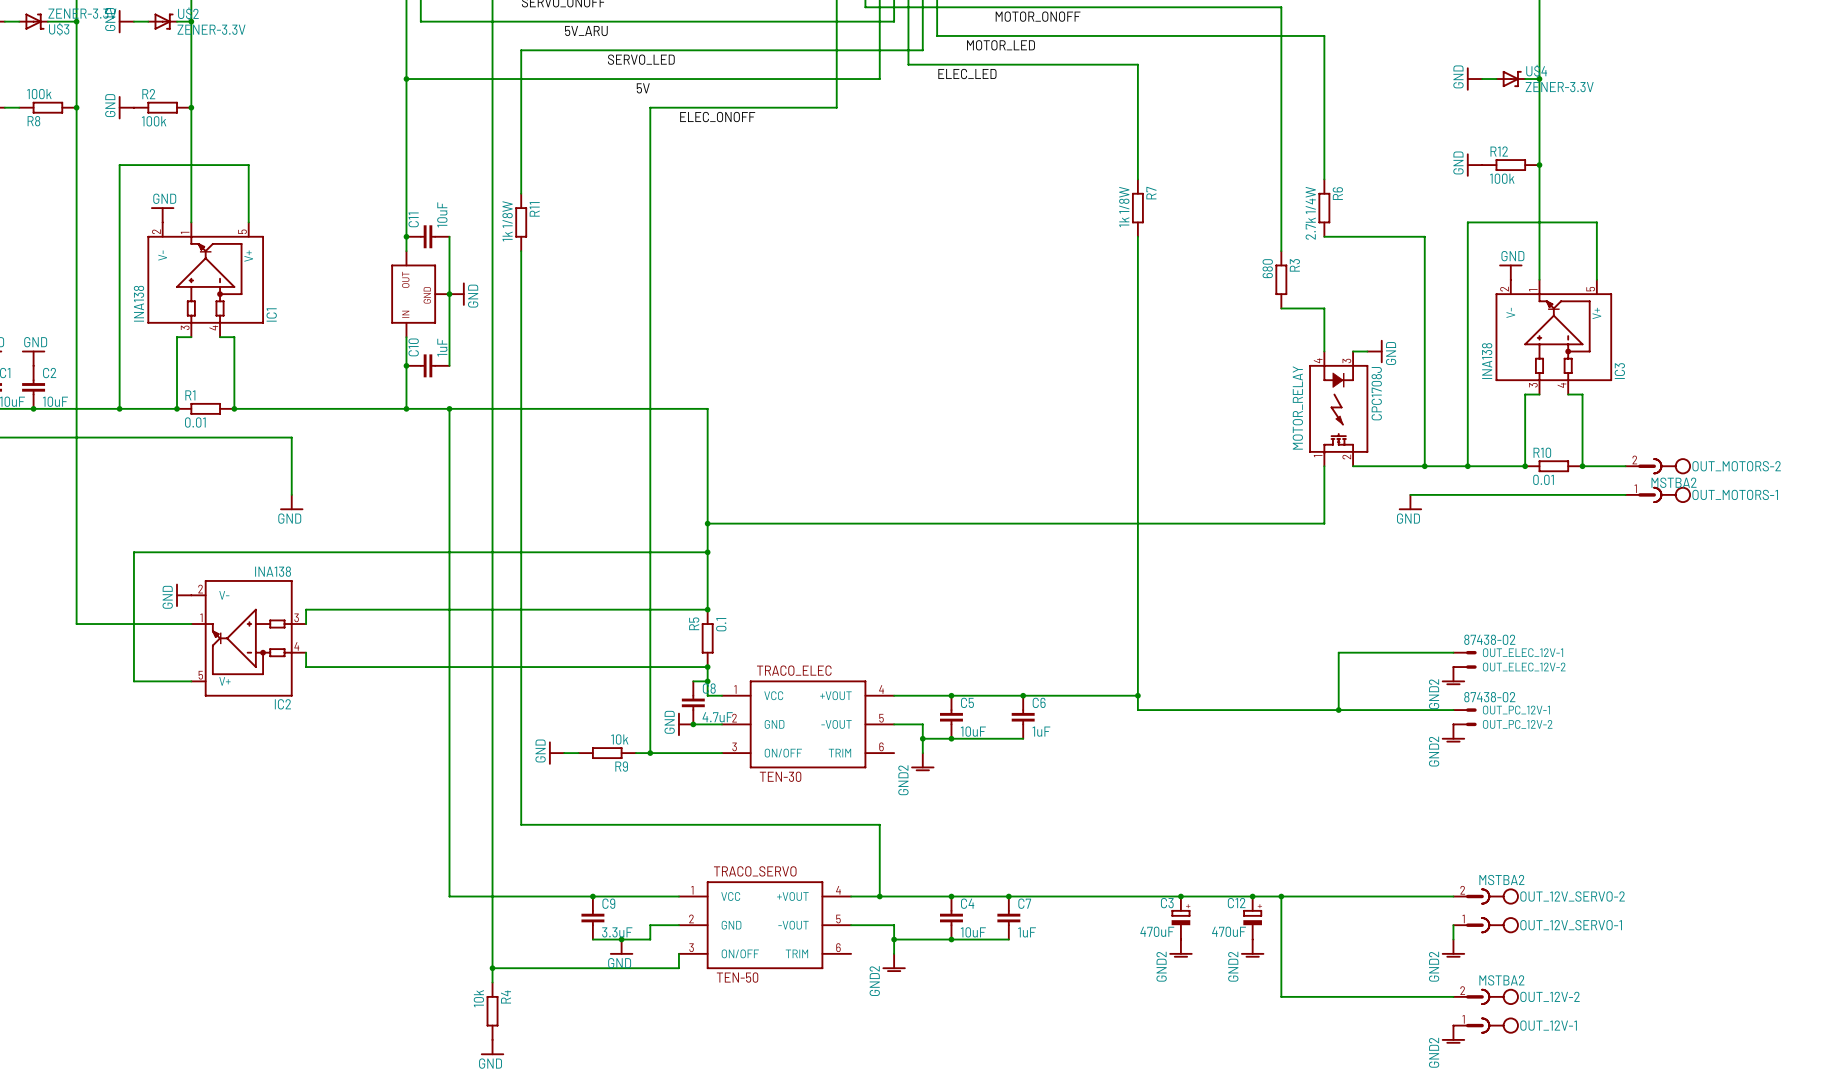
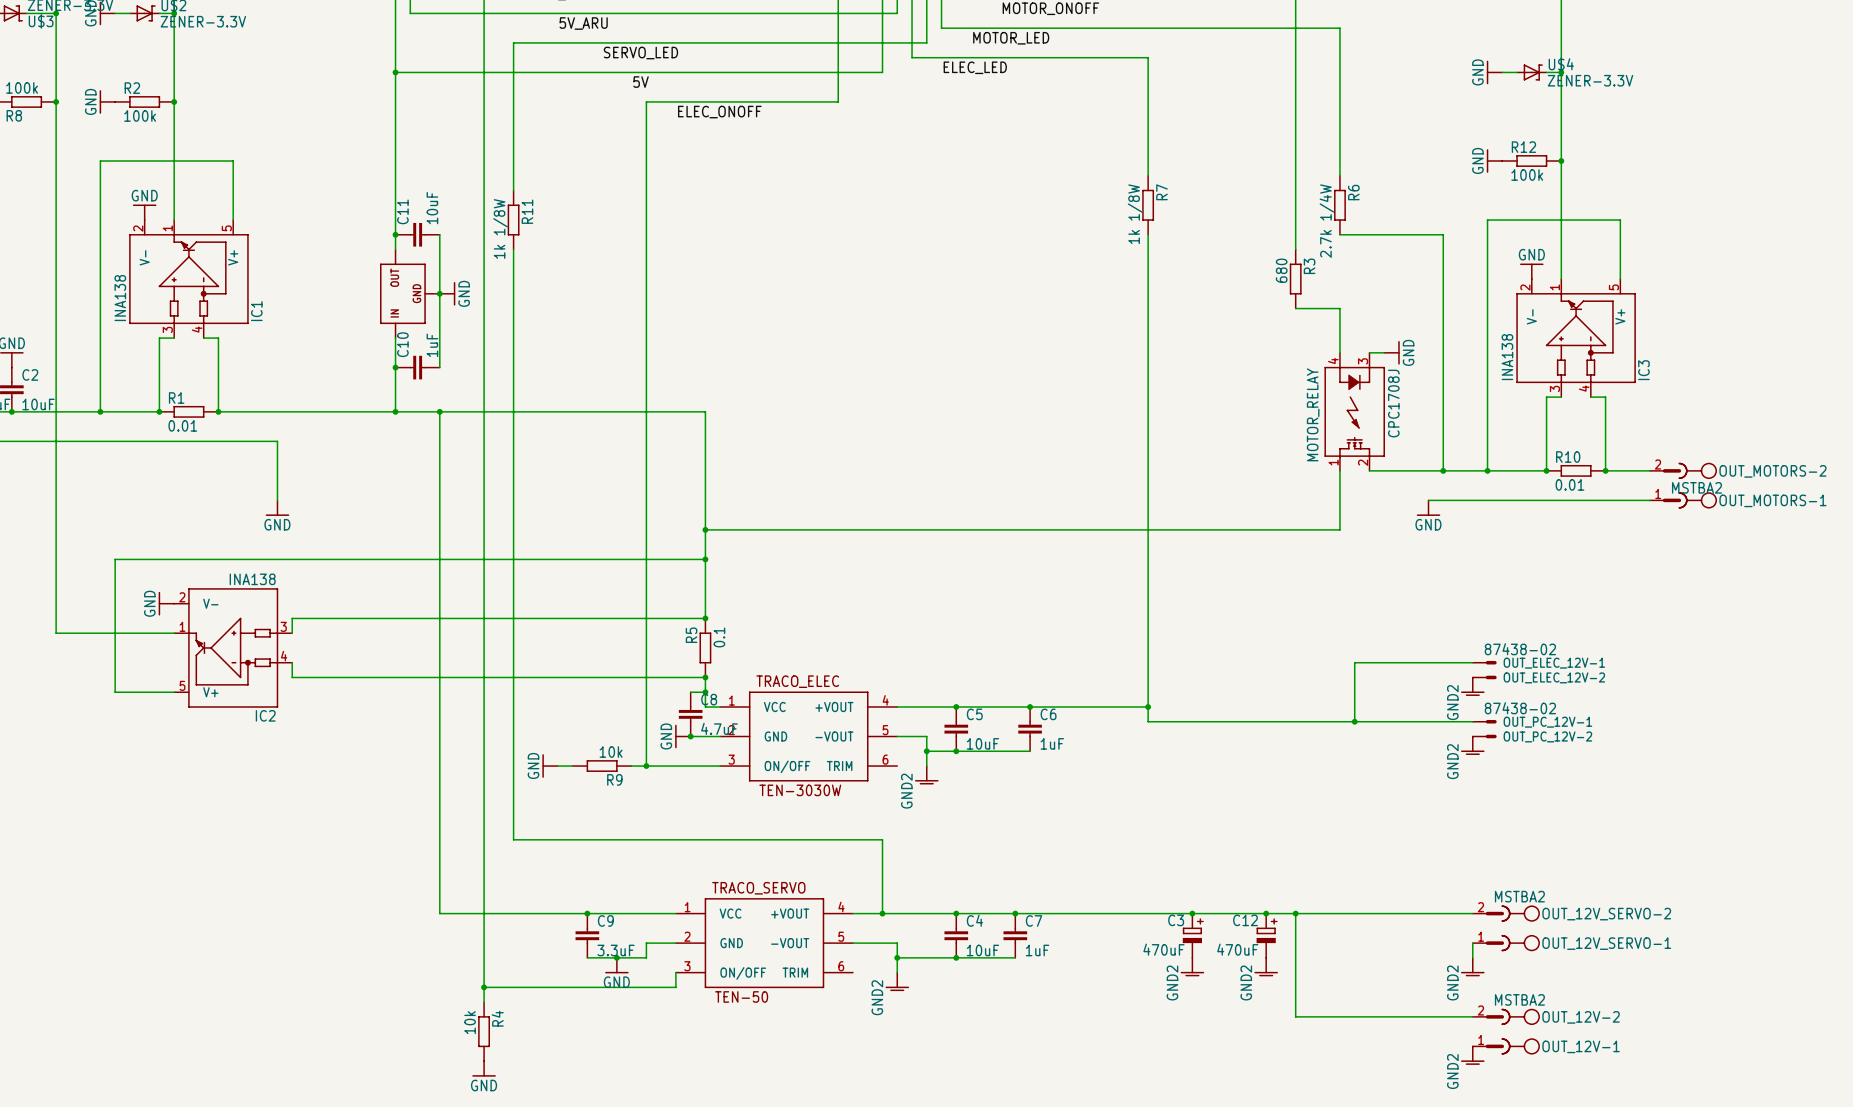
TRACO_ELEC value: TEN-30 (780, 776) -> TEN-3030W (800, 790)

